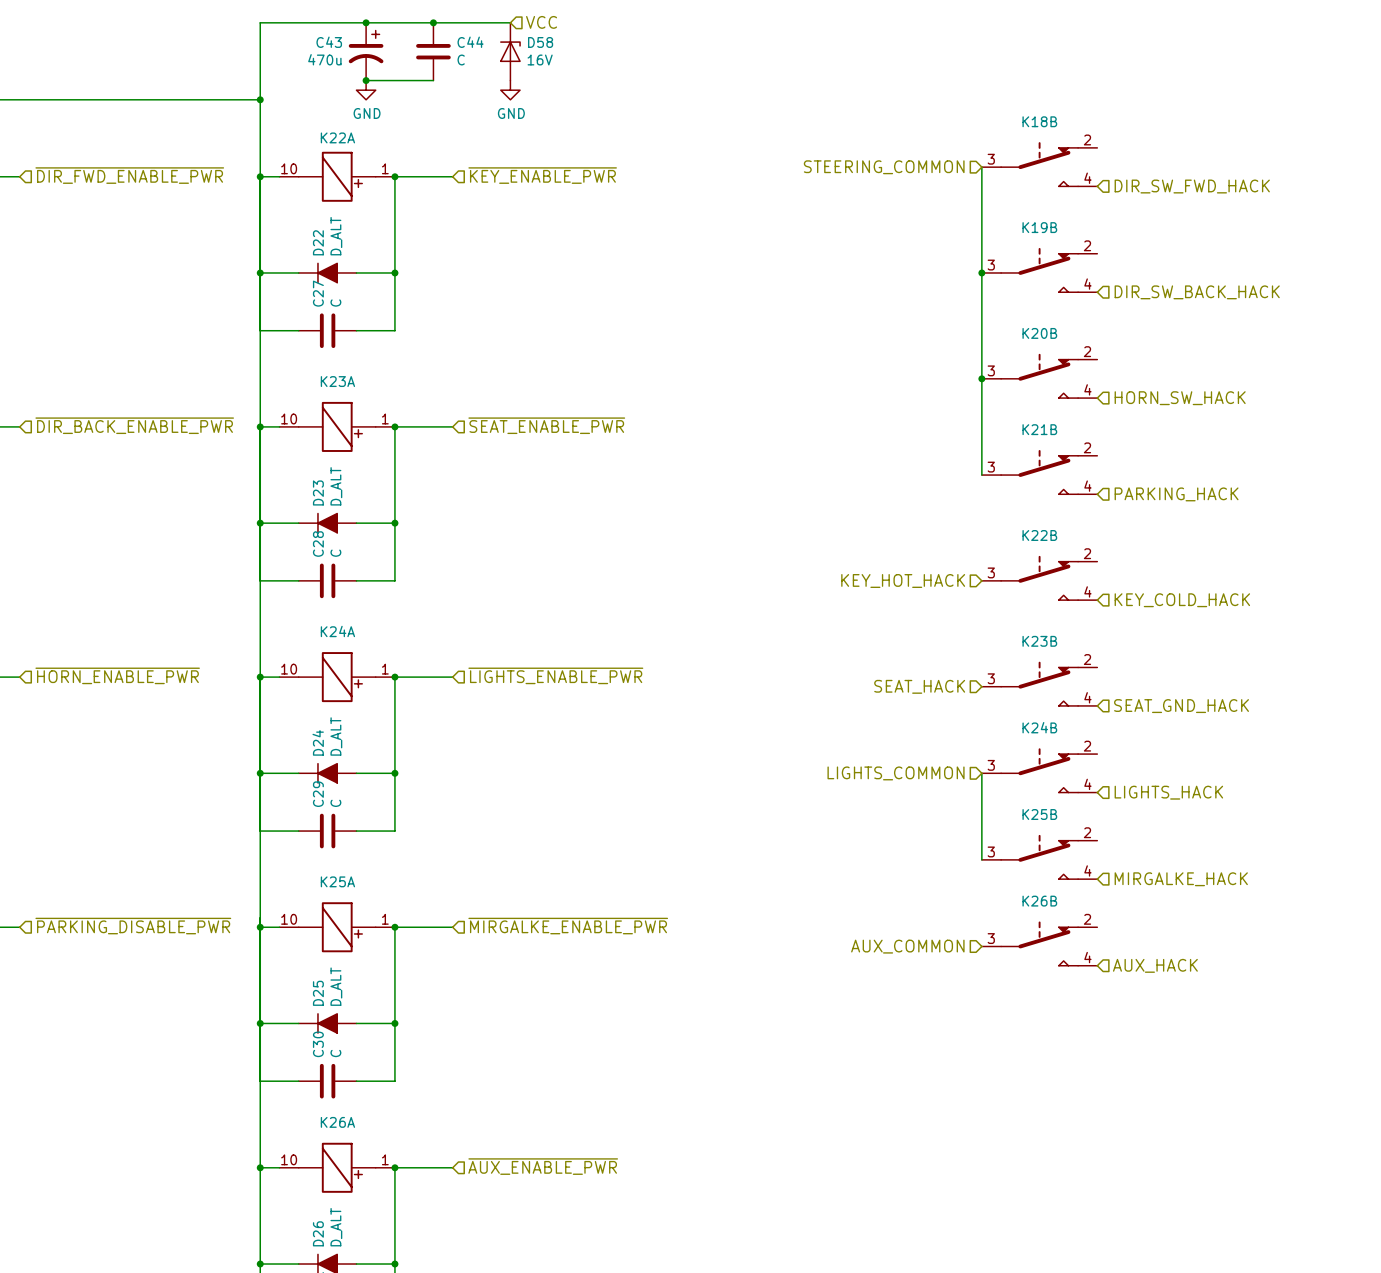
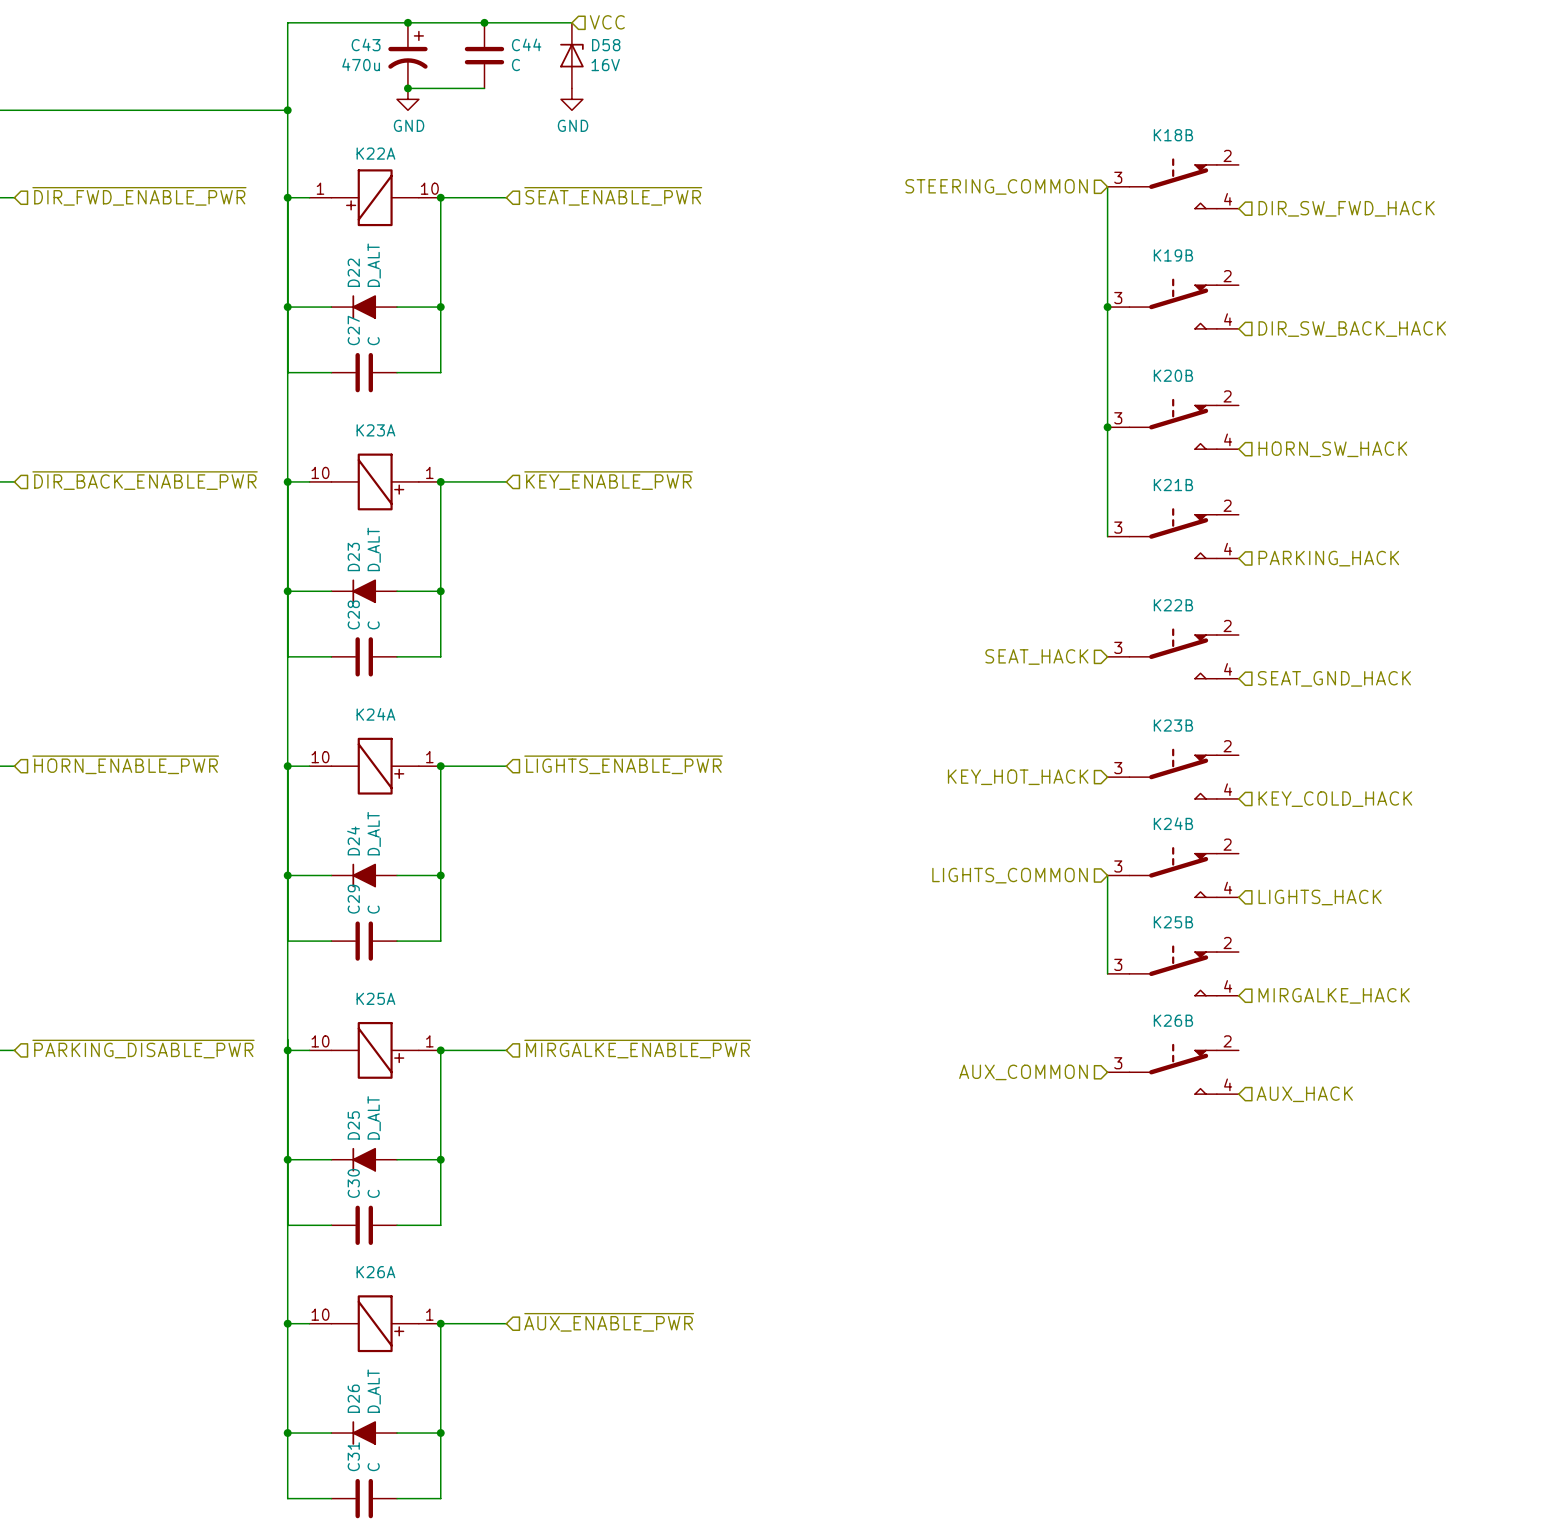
hierarchical label: ~{KEY_ENABLE_PWR} (542, 175) -> ~{SEAT_ENABLE_PWR} (613, 196)
K22A flip: as is (337, 176) -> left-right (375, 197)
hierarchical label: ~{SEAT_ENABLE_PWR} (546, 425) -> ~{KEY_ENABLE_PWR} (608, 480)
hierarchical label: KEY_HOT_HACK (903, 580) -> SEAT_HACK (1036, 657)
hierarchical label: KEY_COLD_HACK (1182, 600) -> SEAT_GND_HACK (1334, 678)
hierarchical label: SEAT_HACK (919, 686) -> KEY_HOT_HACK (1018, 777)
hierarchical label: SEAT_GND_HACK (1181, 706) -> KEY_COLD_HACK (1335, 799)

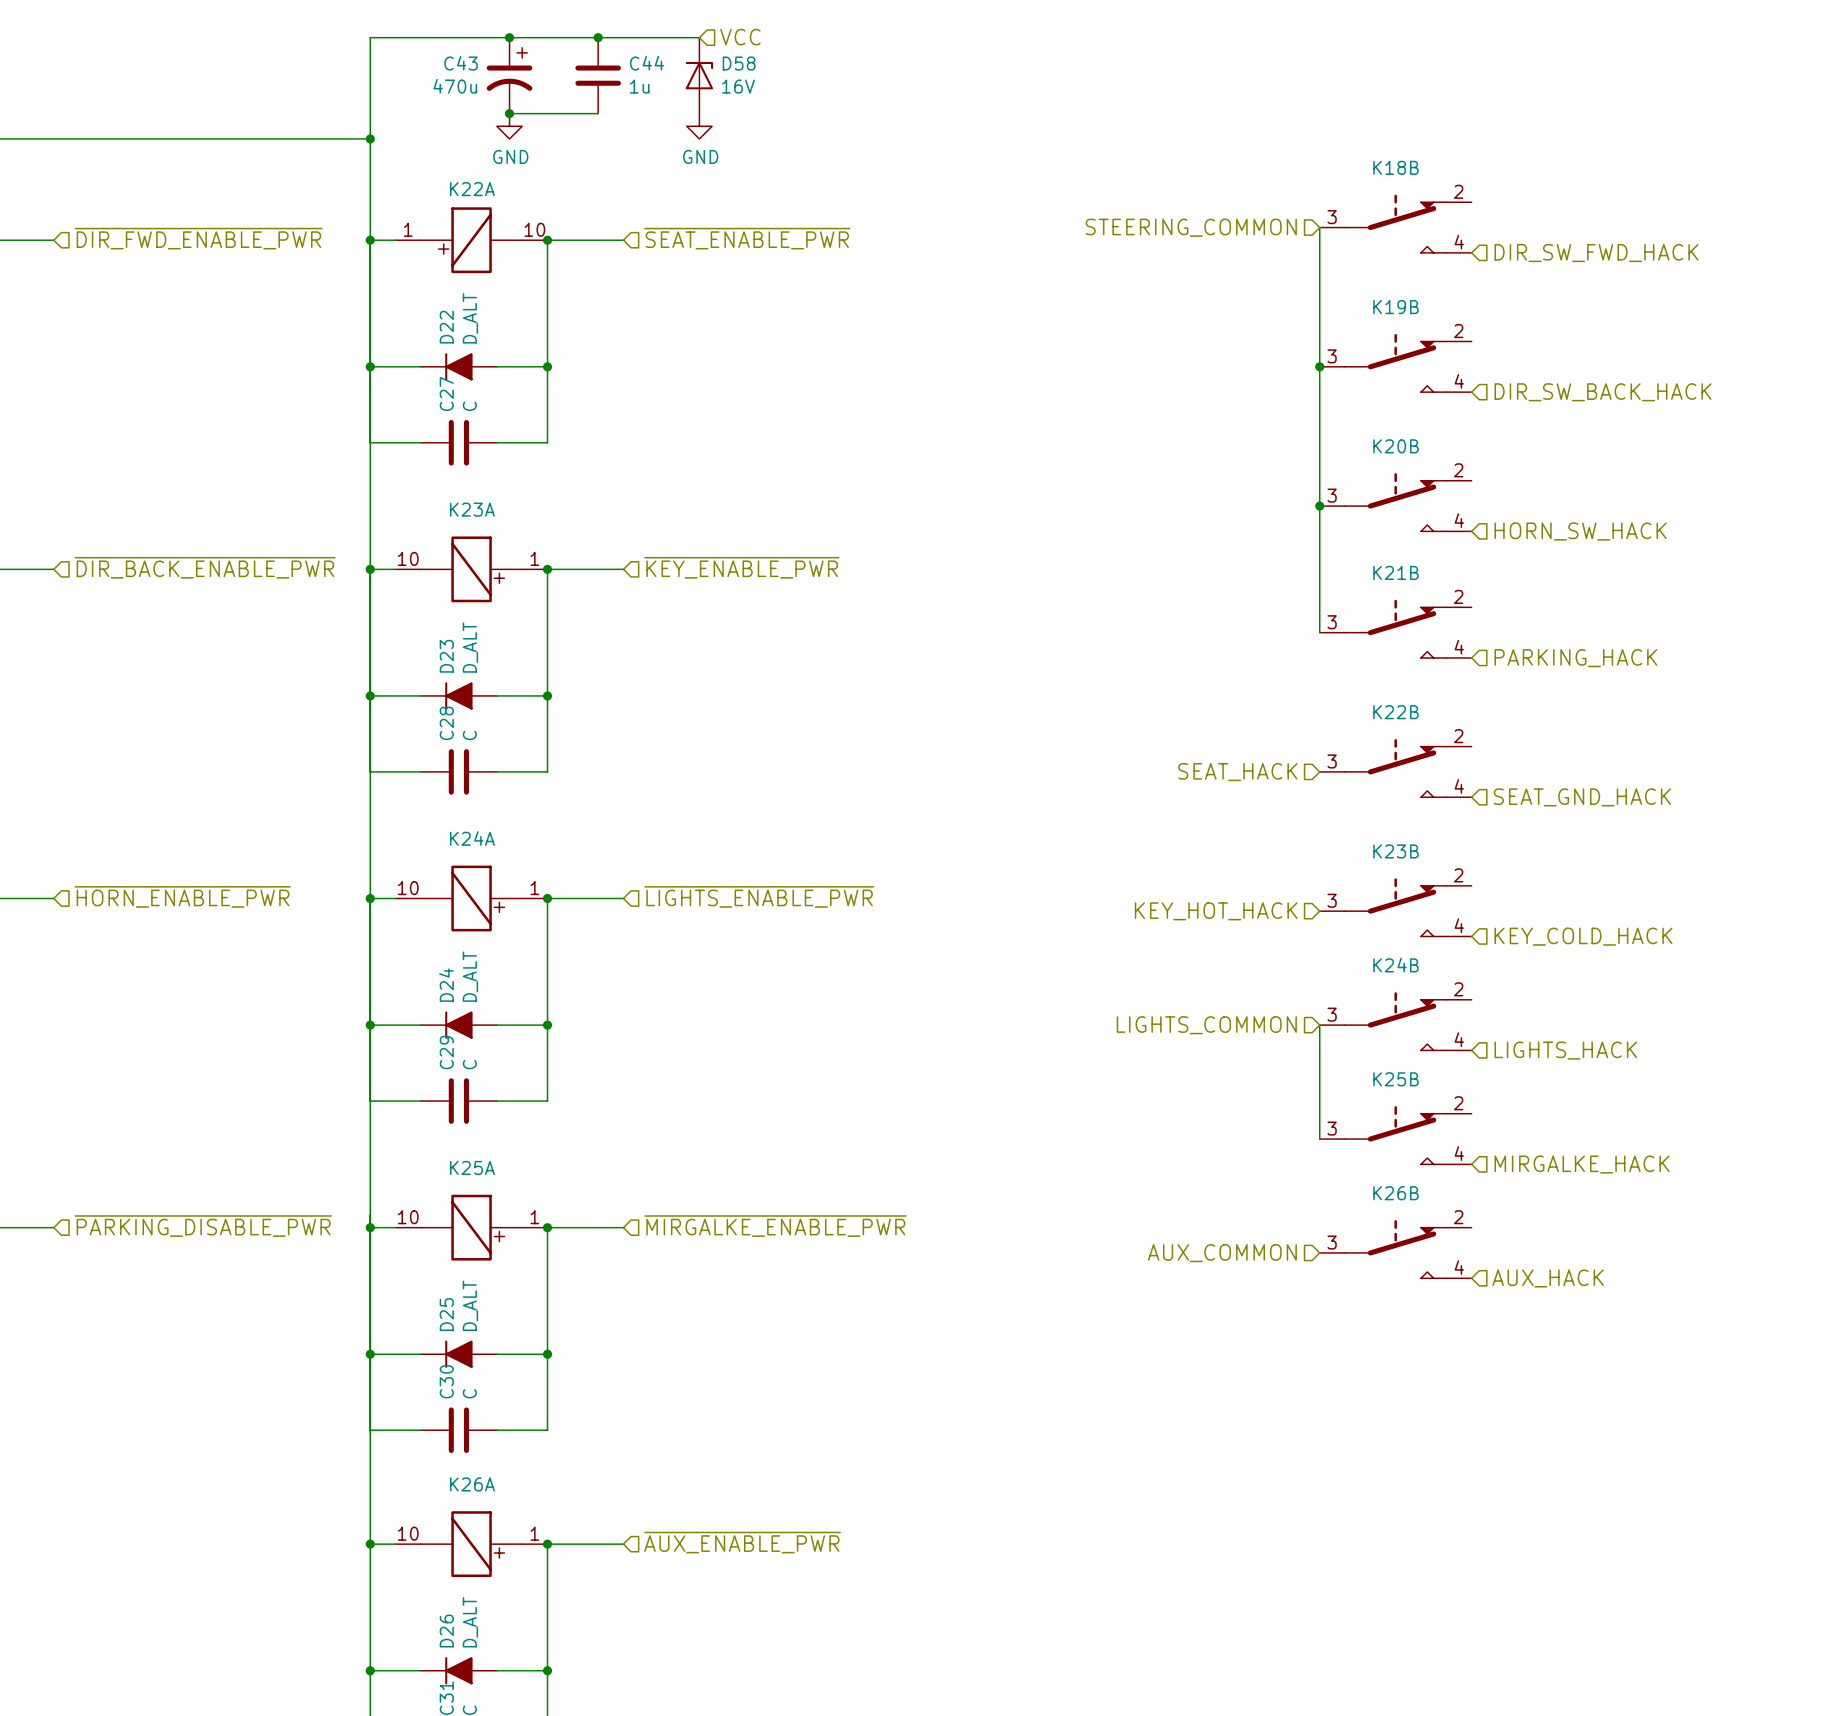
C44 value: C (515, 65) -> 1u (639, 86)

